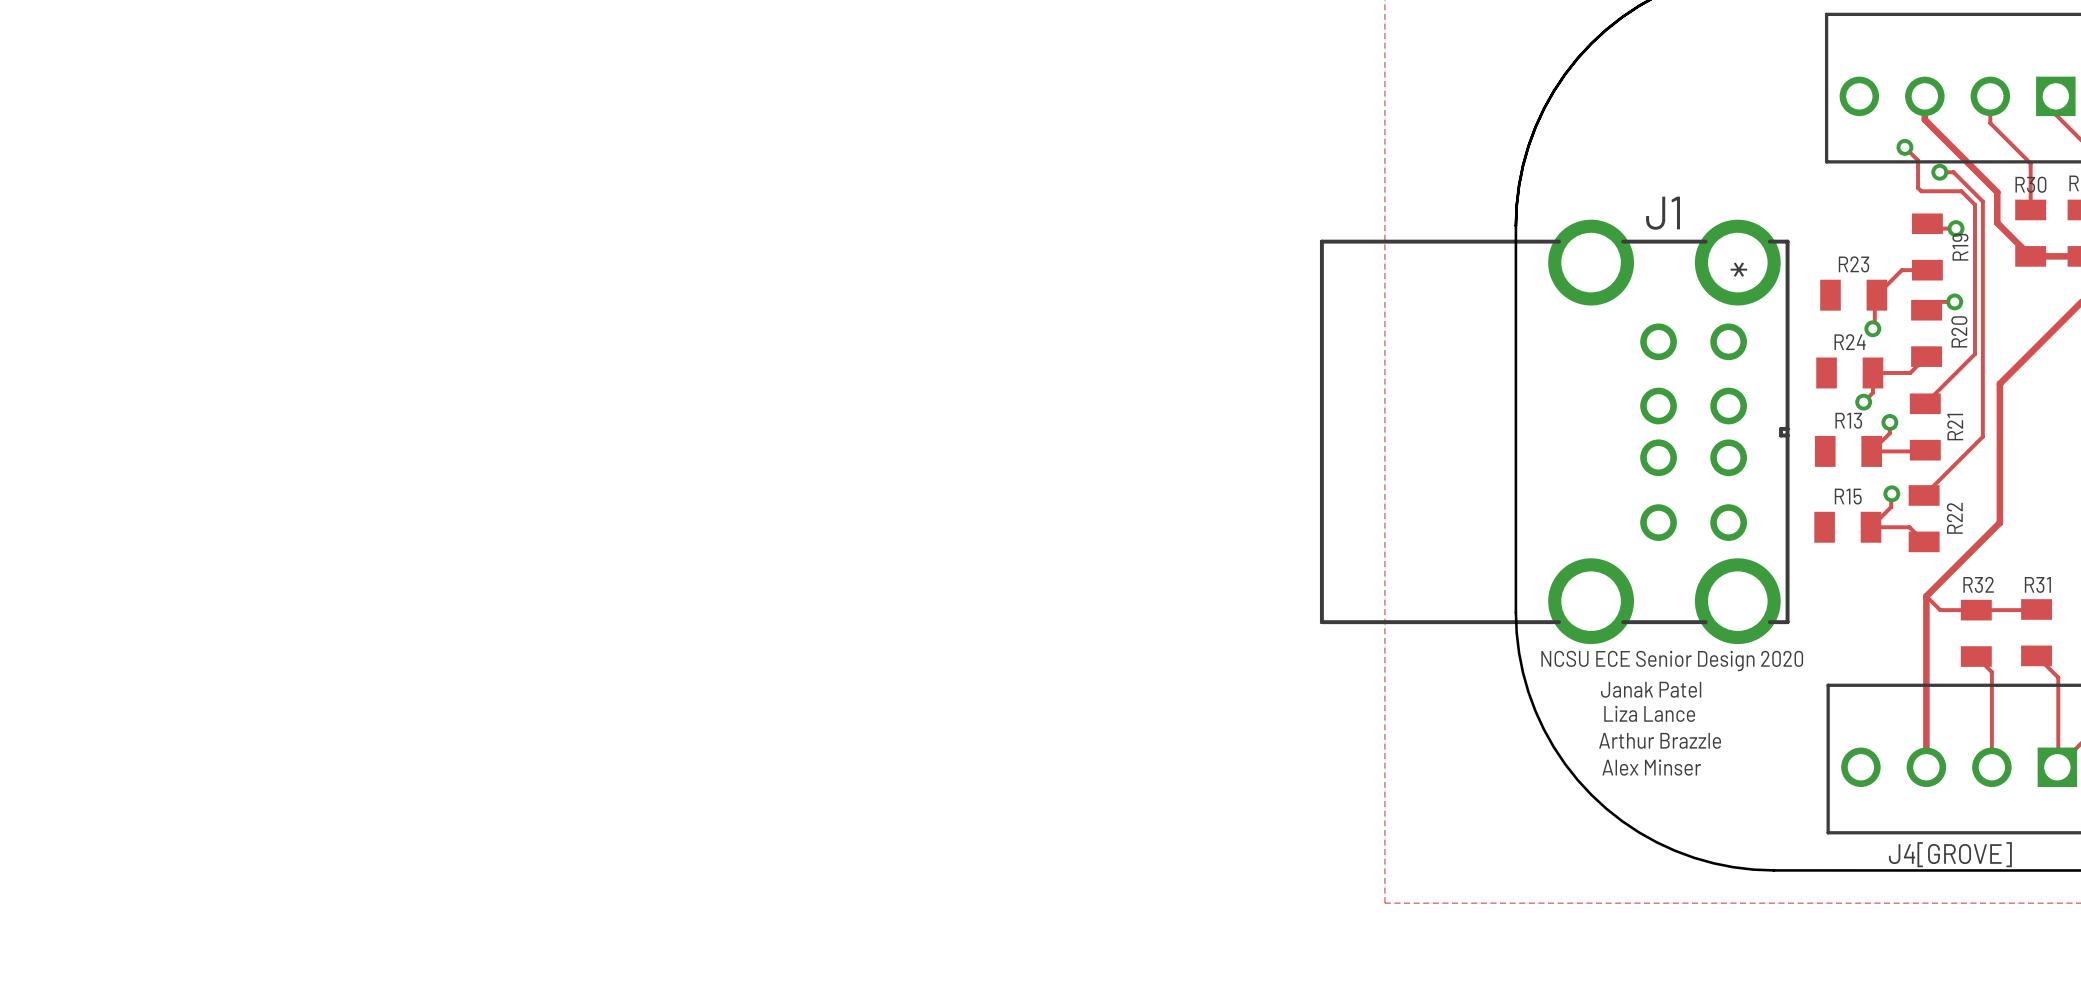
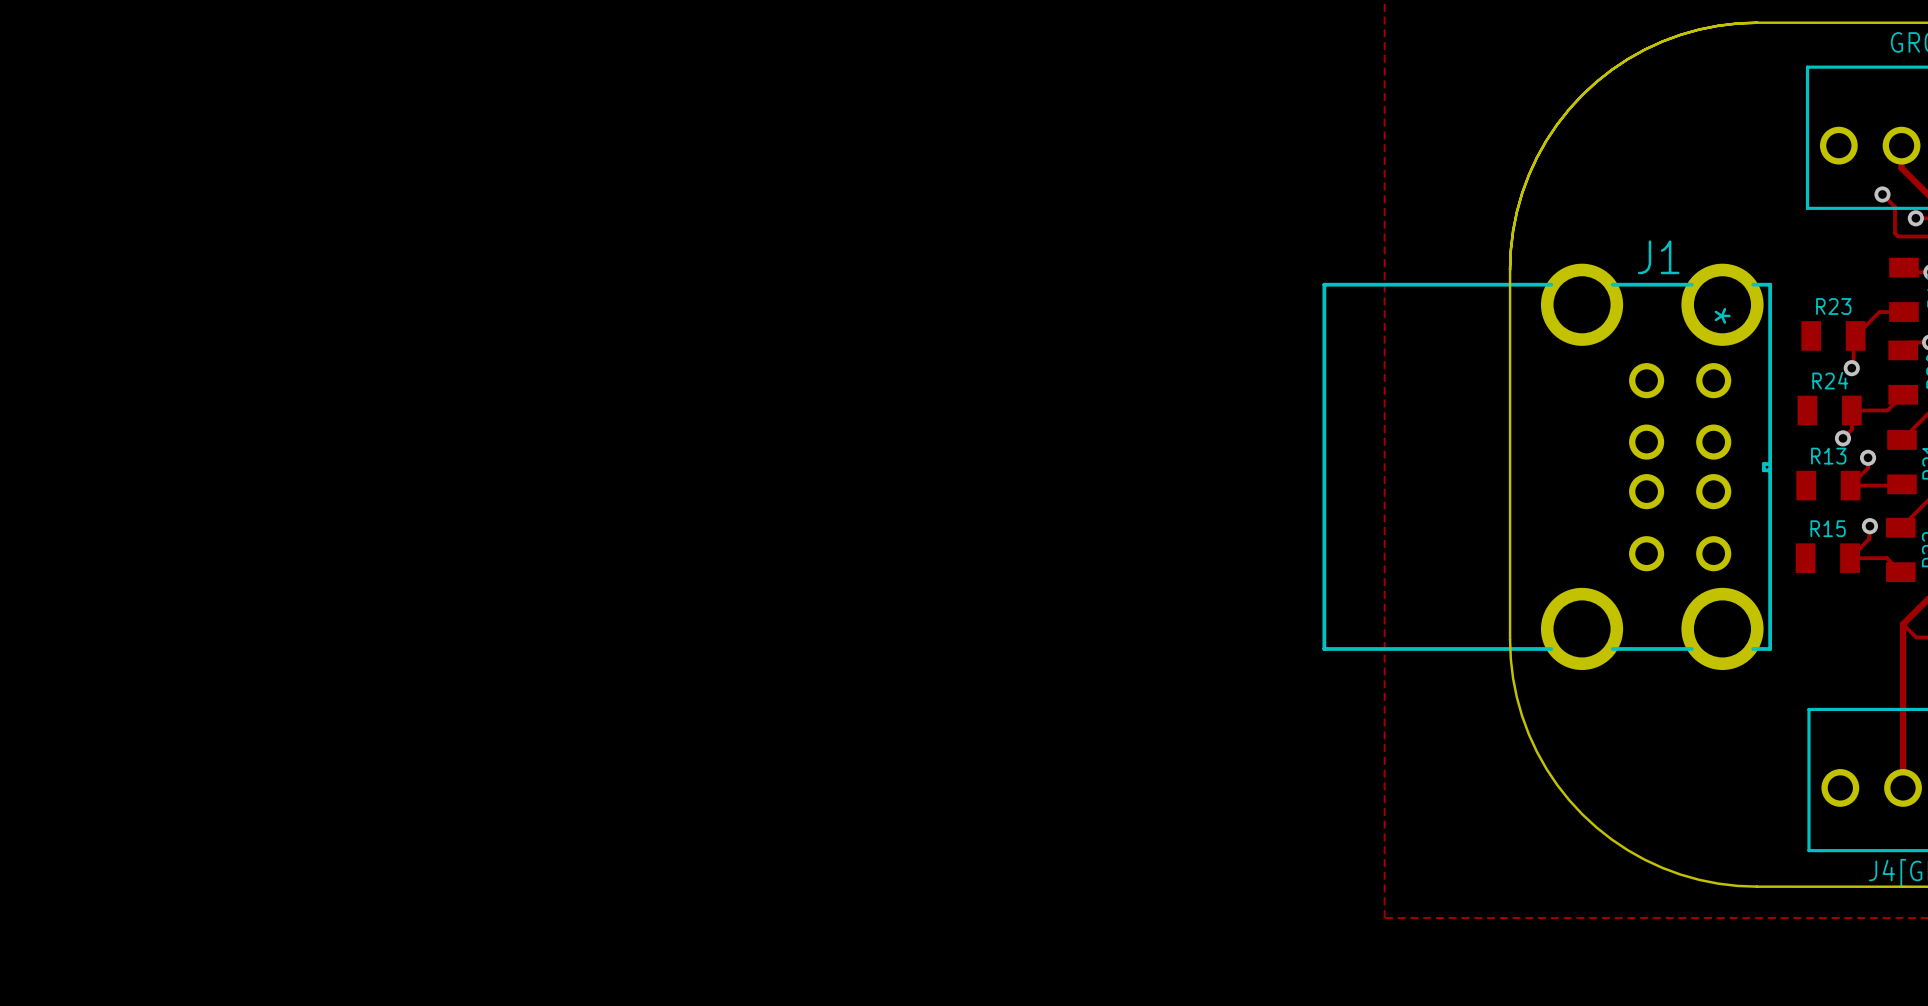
text: NCSU ECE Senior Design 2020 (1672, 661) -> none
text: Janak Patel (1651, 689) -> none
text: Liza Lance (1649, 713) -> none
text: Arthur Brazzle (1660, 740) -> none
text: Alex Minser (1651, 767) -> none

